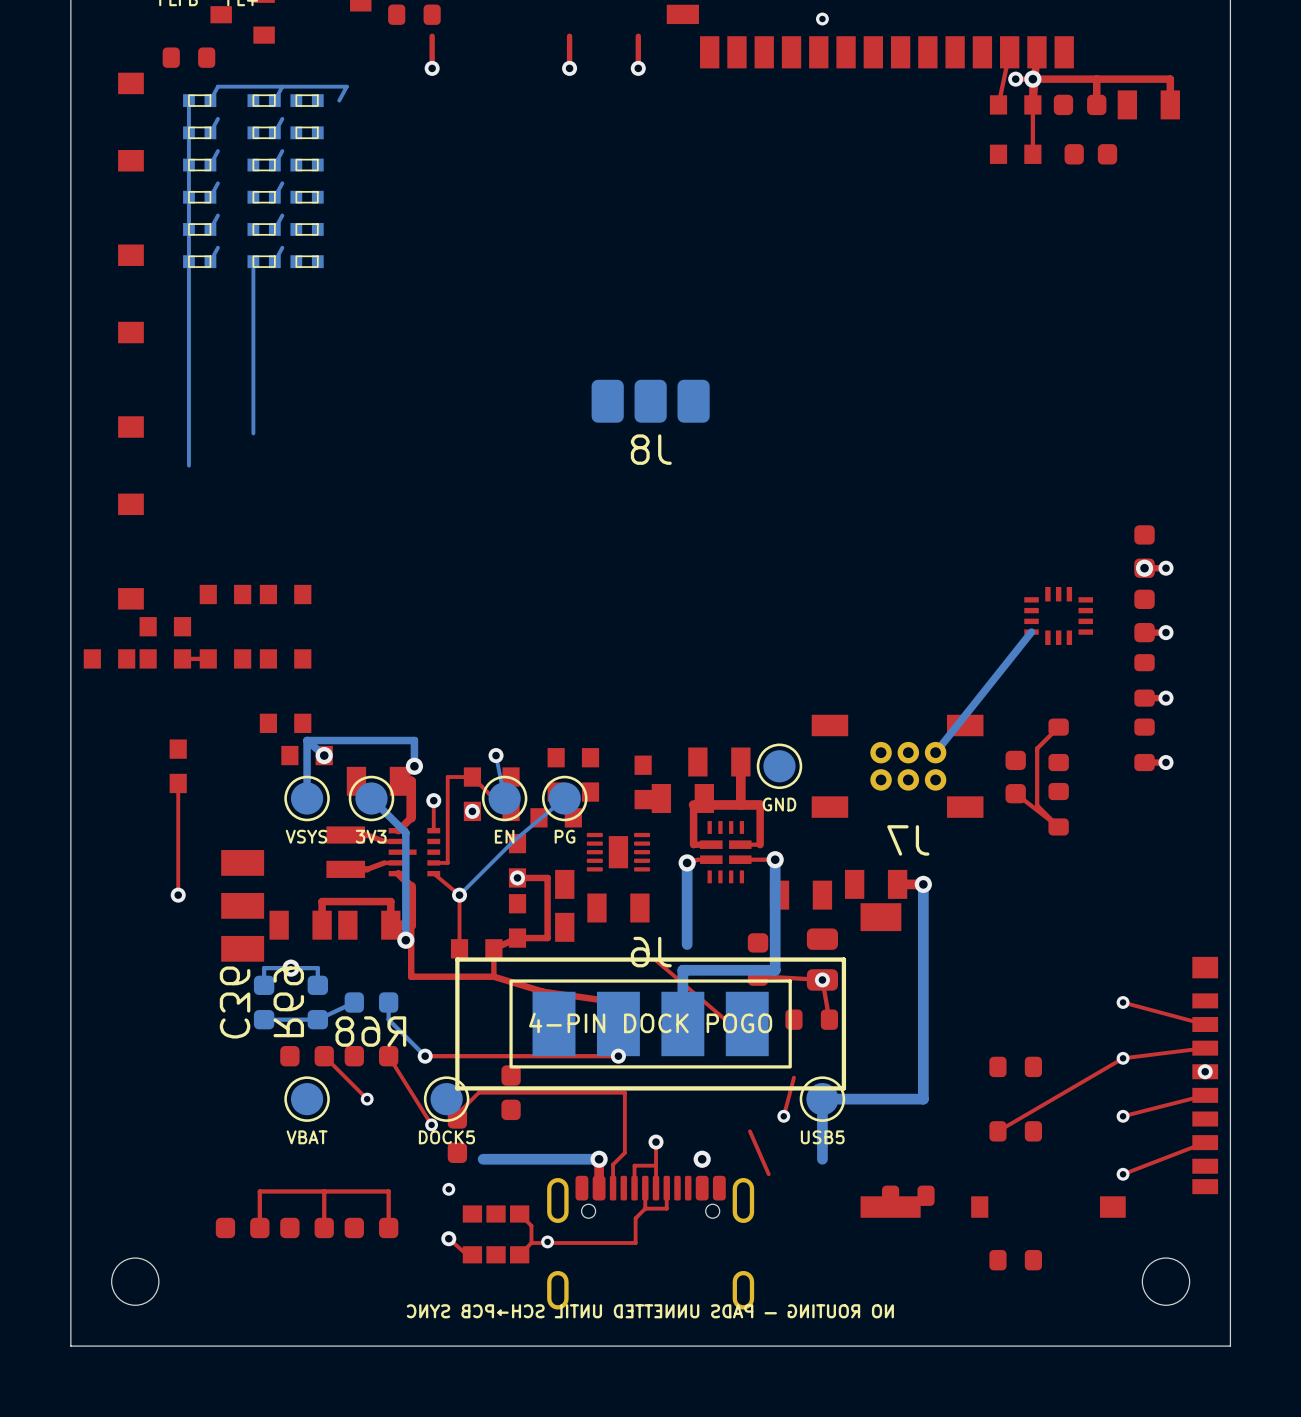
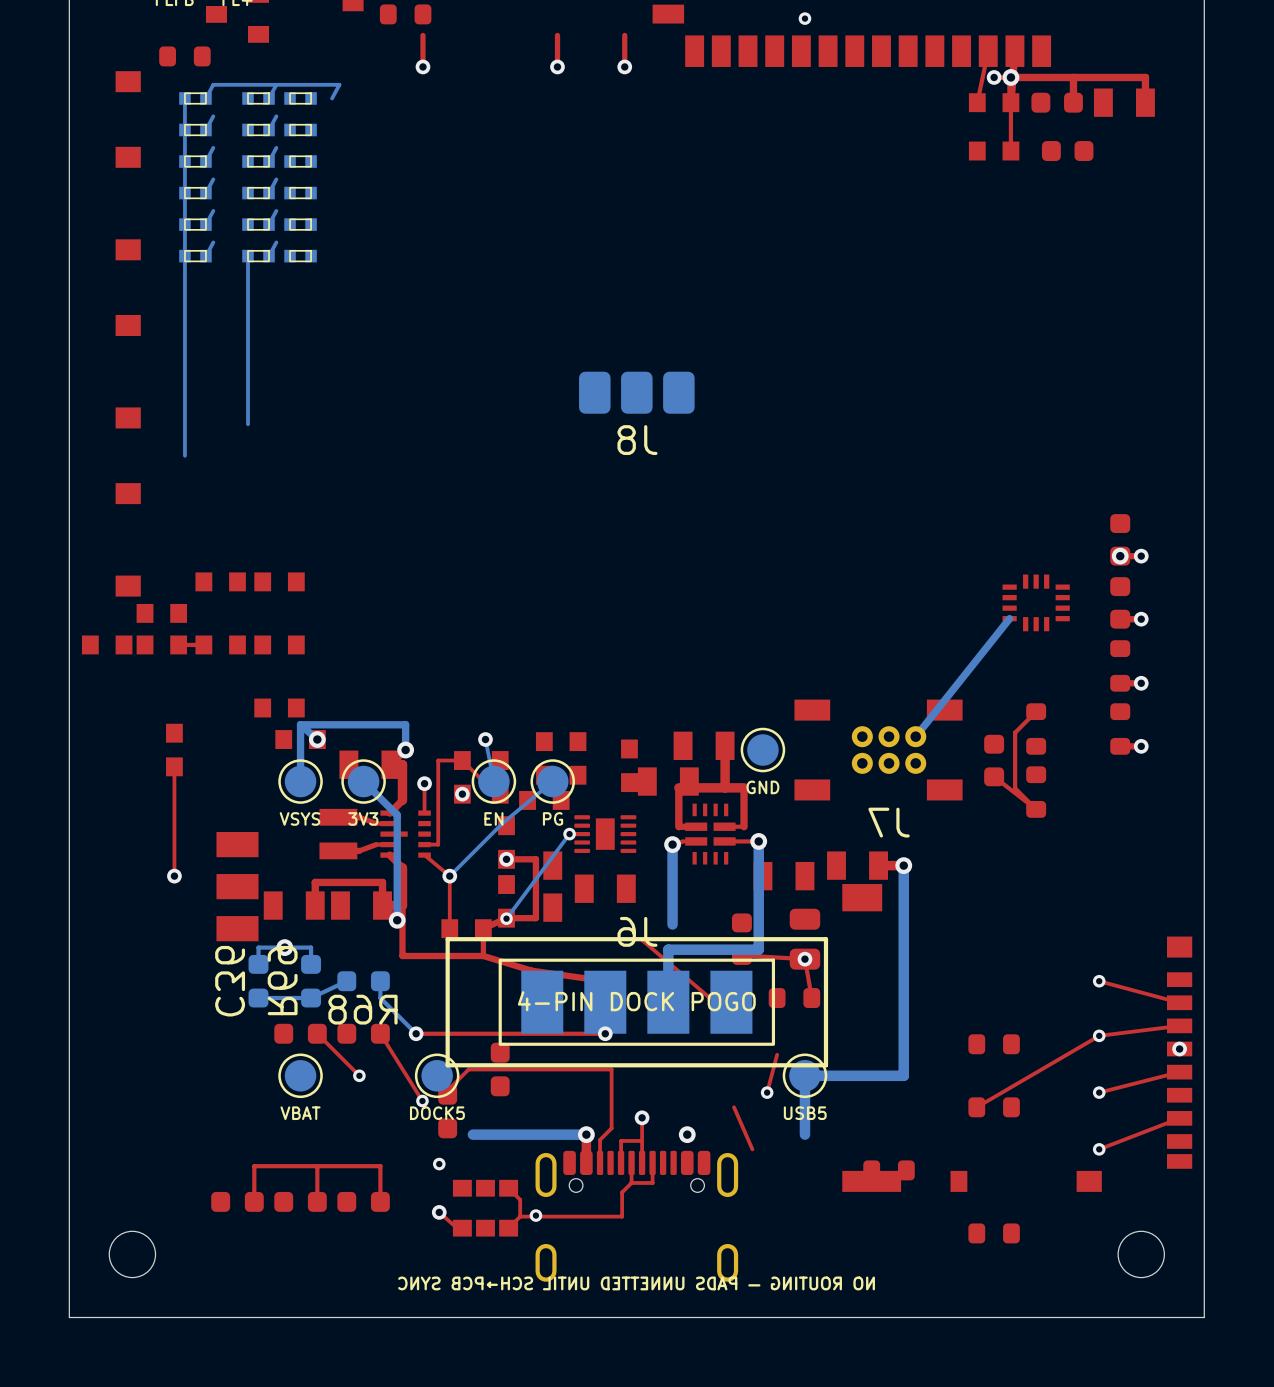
bottom track: none -> (569, 834) (506, 918)
via: none -> (569, 834)
via: none -> (506, 918)

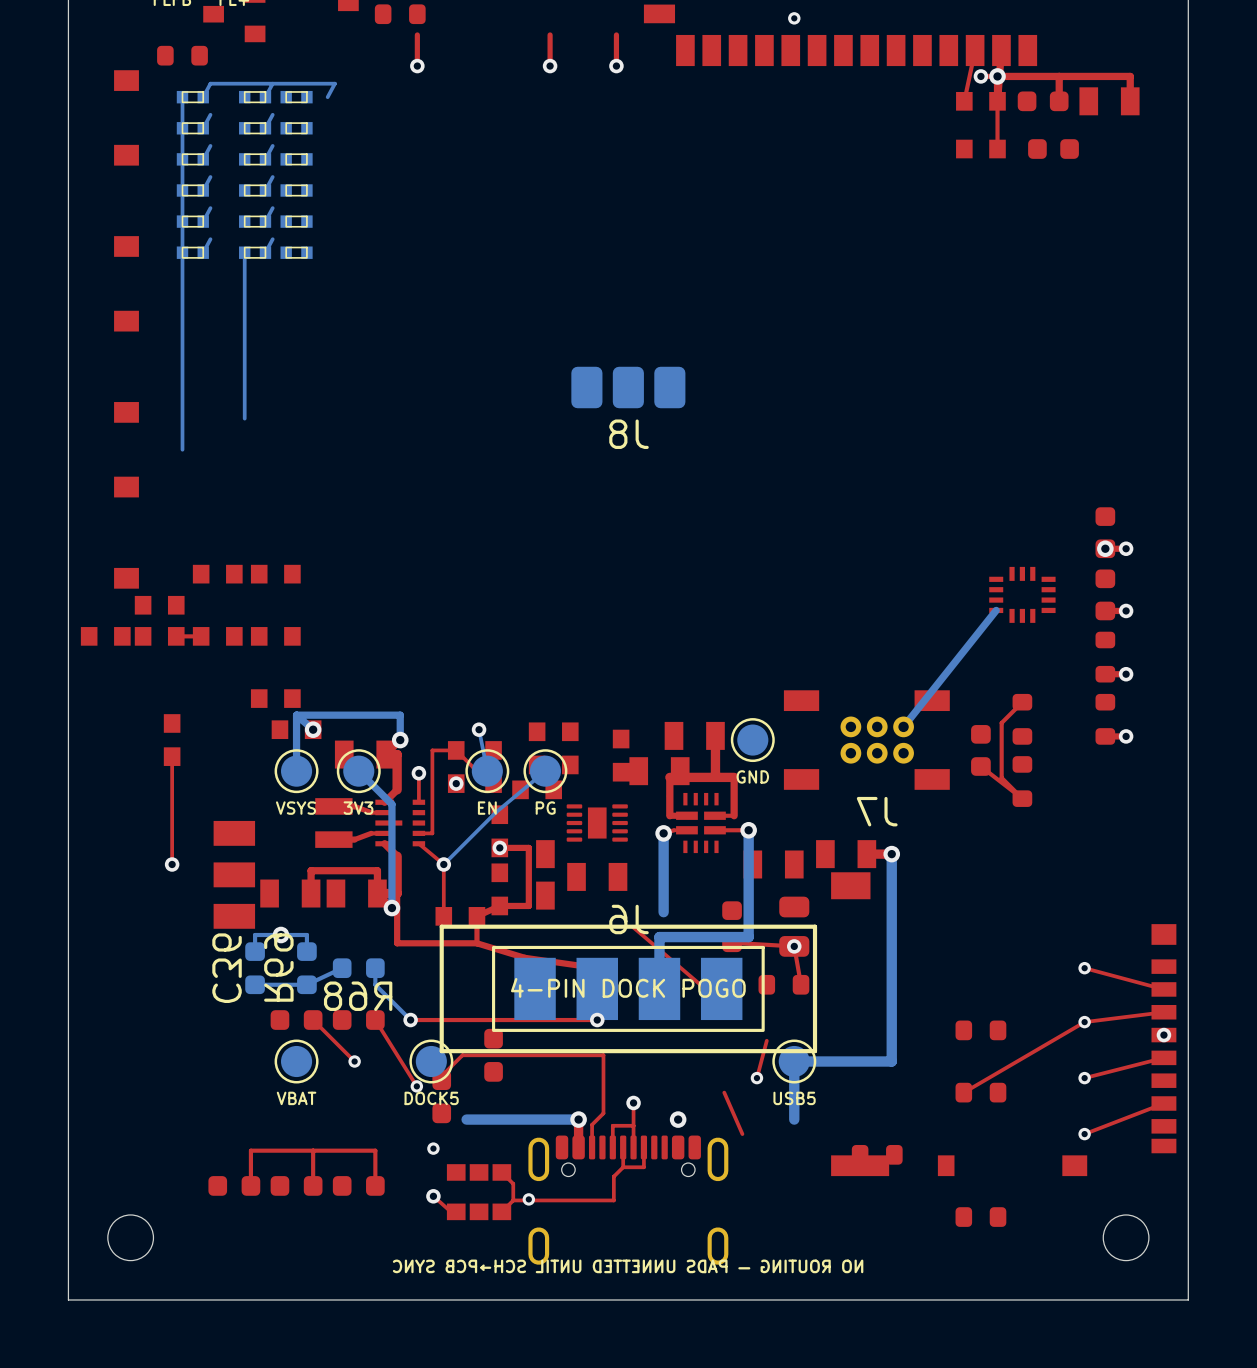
bottom track: (569, 834) (506, 918) -> none
via: (569, 834) -> none
via: (506, 918) -> none

